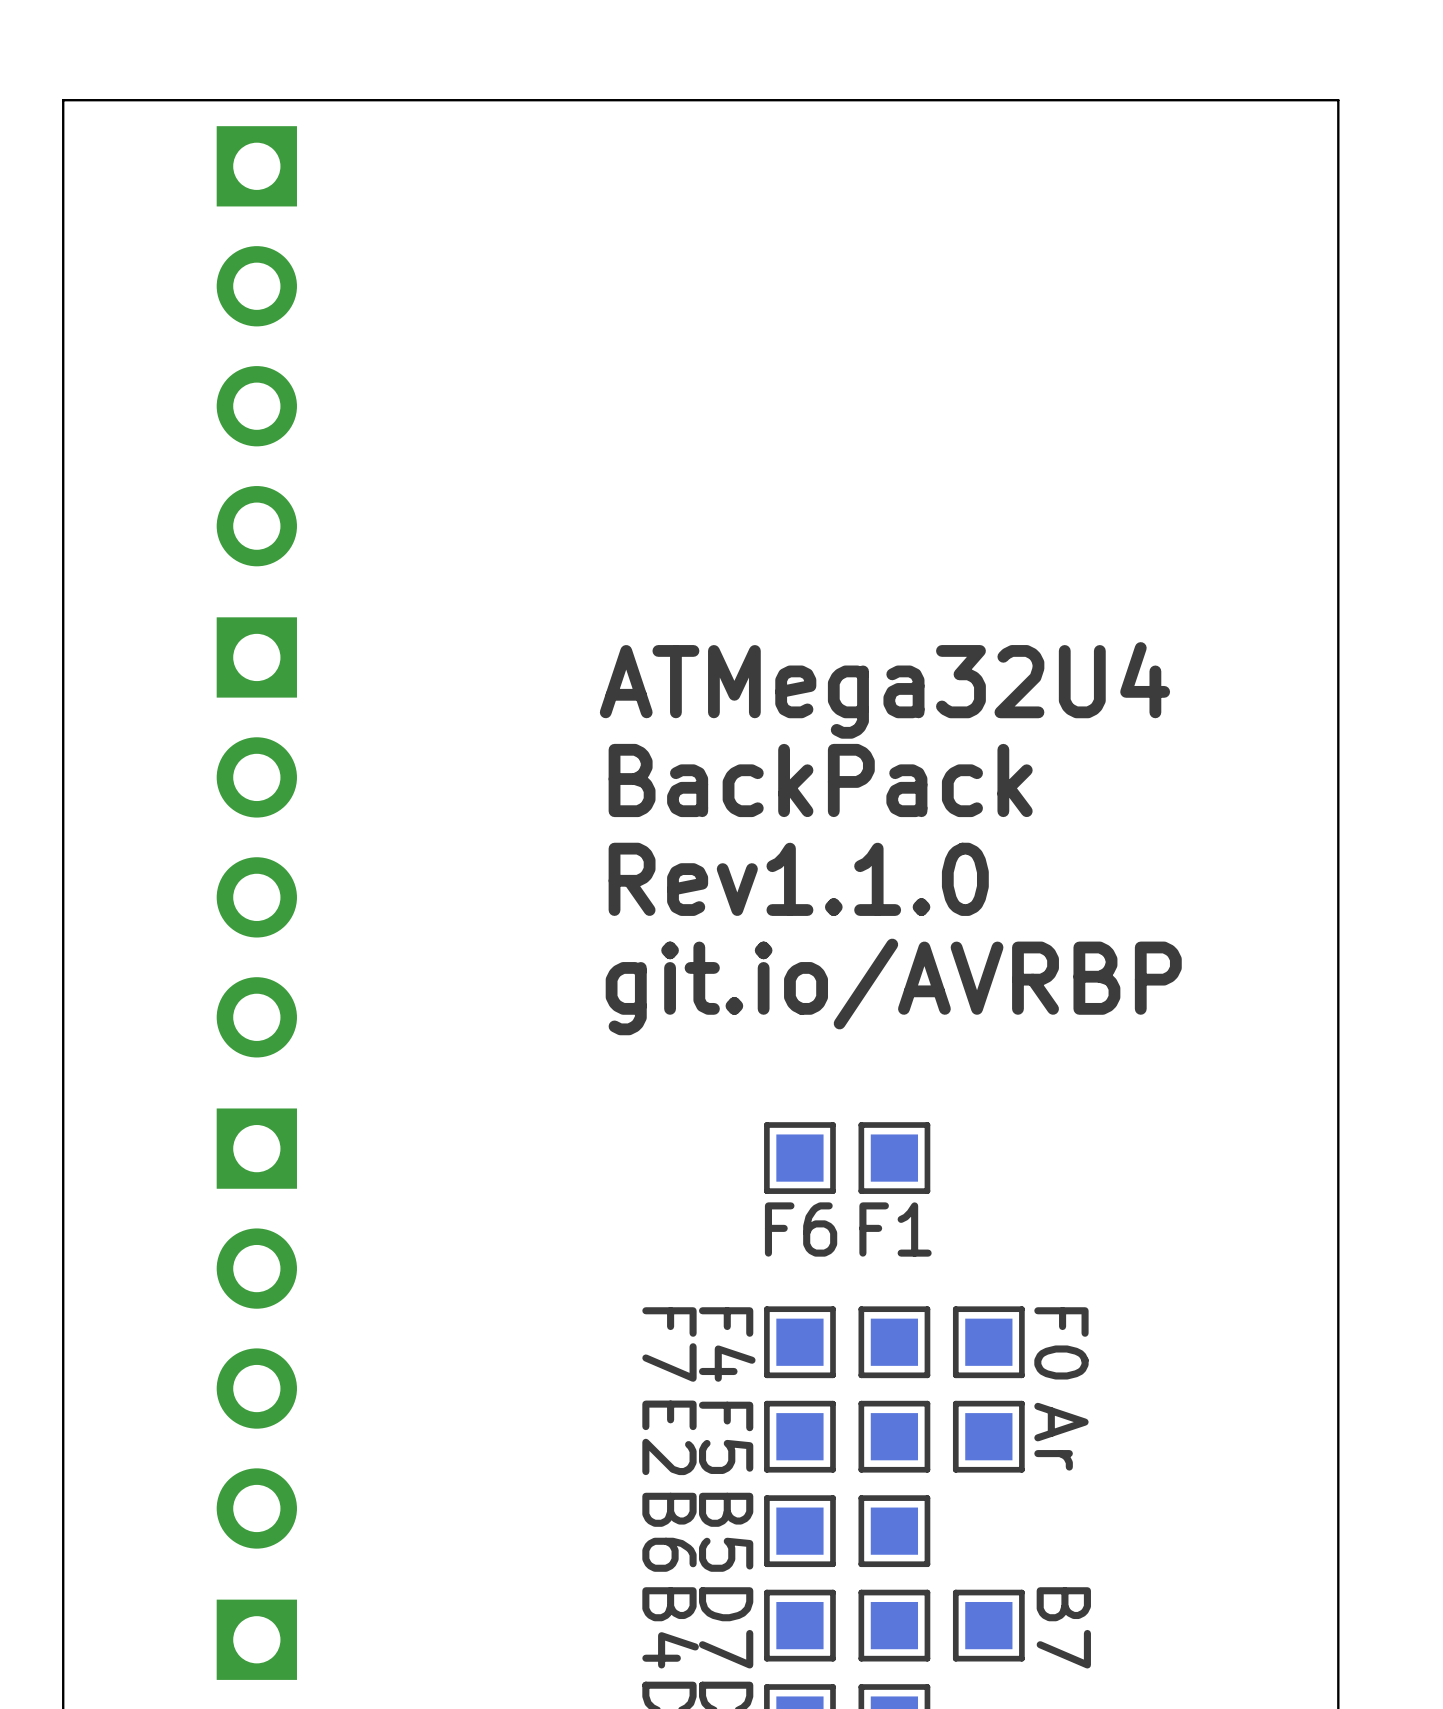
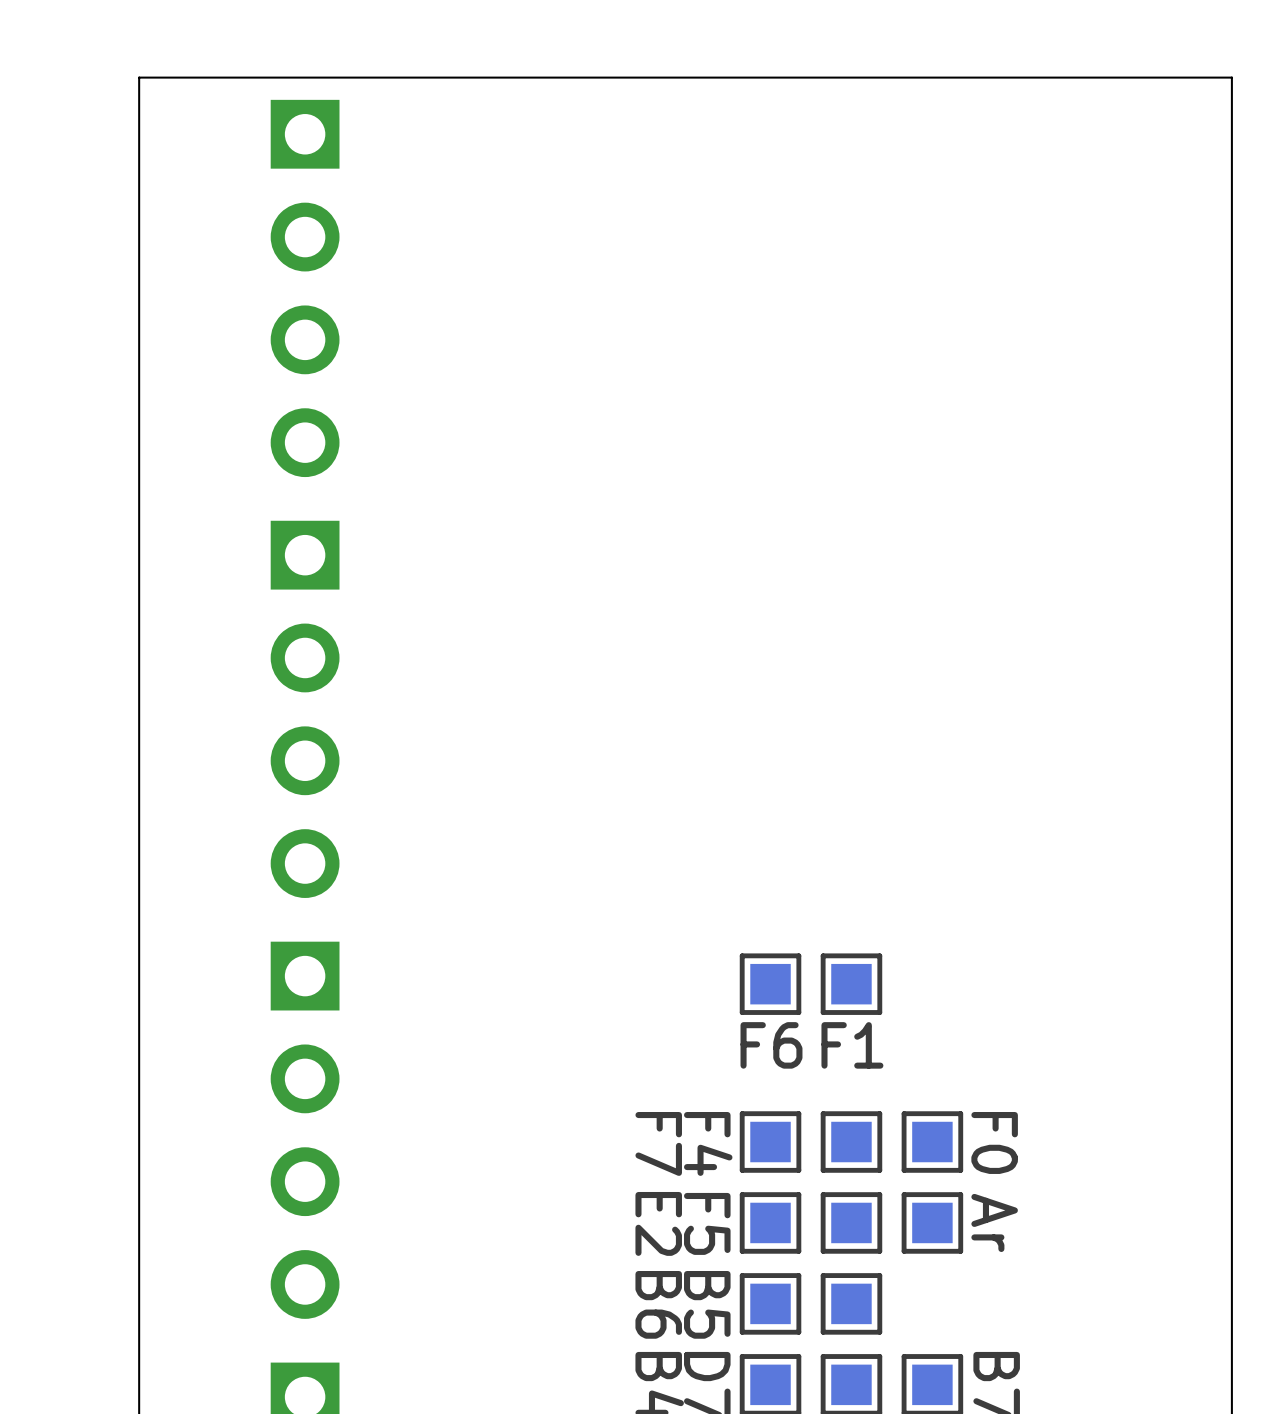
text: ATMega32U4 (884, 690) -> none
text: BackPack (820, 780) -> none
text: Rev1.1.0 (798, 879) -> none
text: git.io/AVRBP (893, 986) -> none

